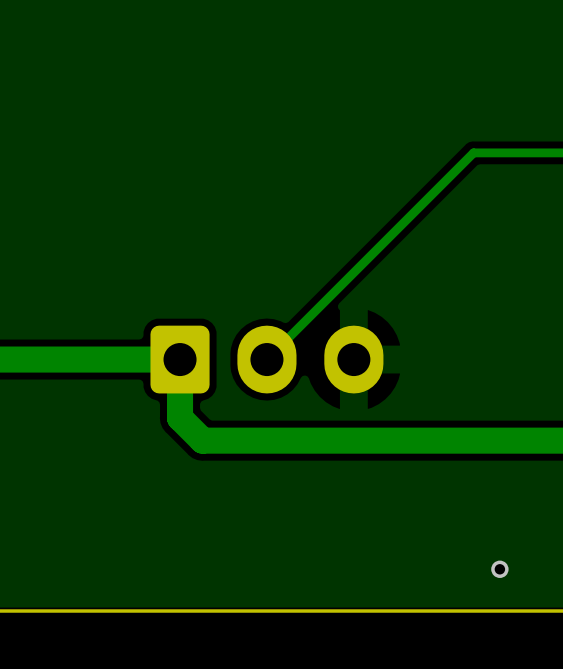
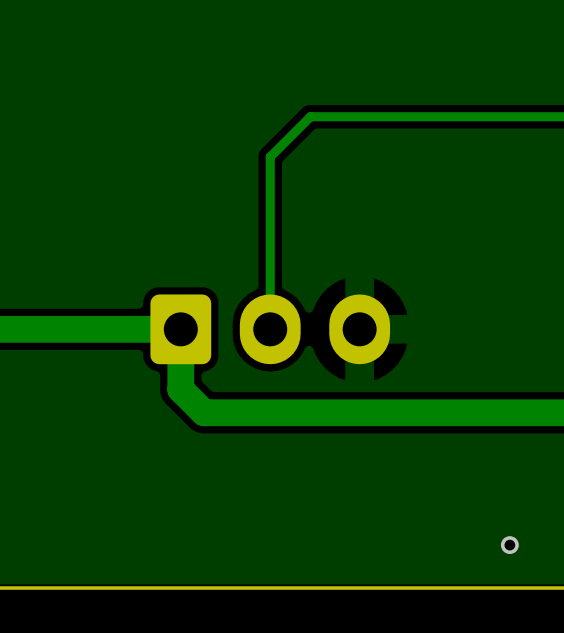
track: (473, 152) (266, 359) -> (482, 116) (310, 116) (270, 157) (270, 329)

